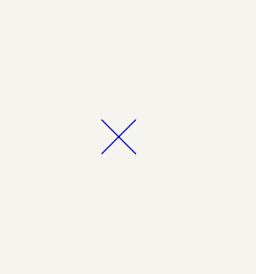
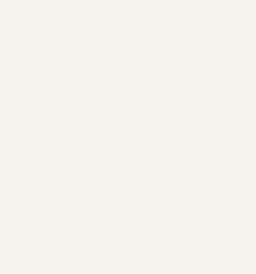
no-connect mark: (118, 136) -> none

